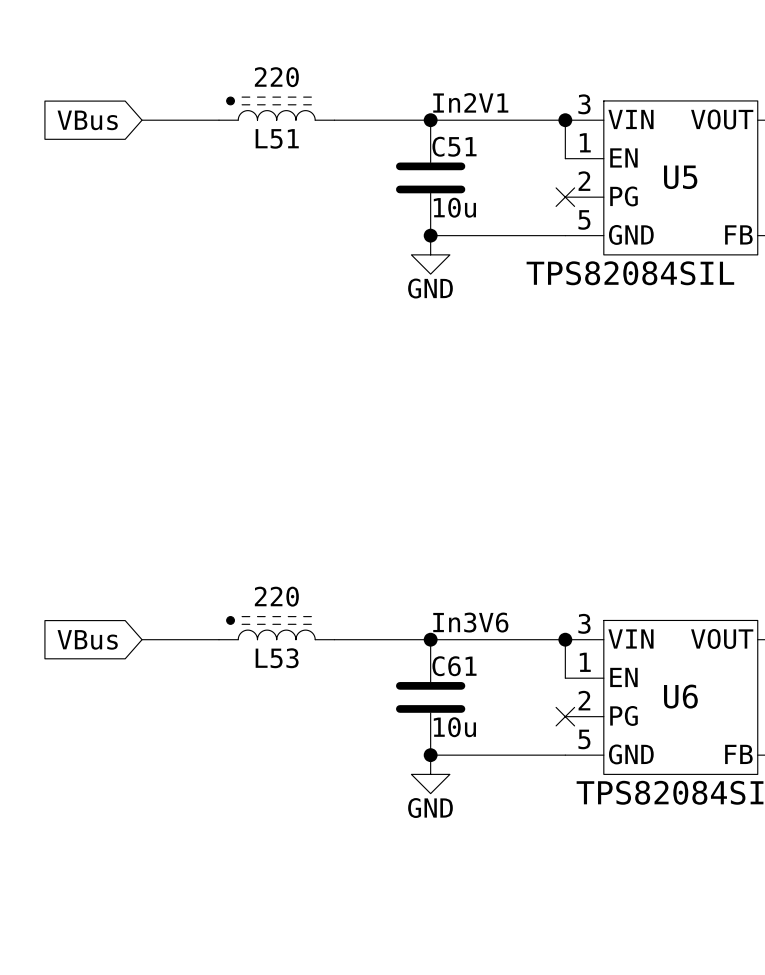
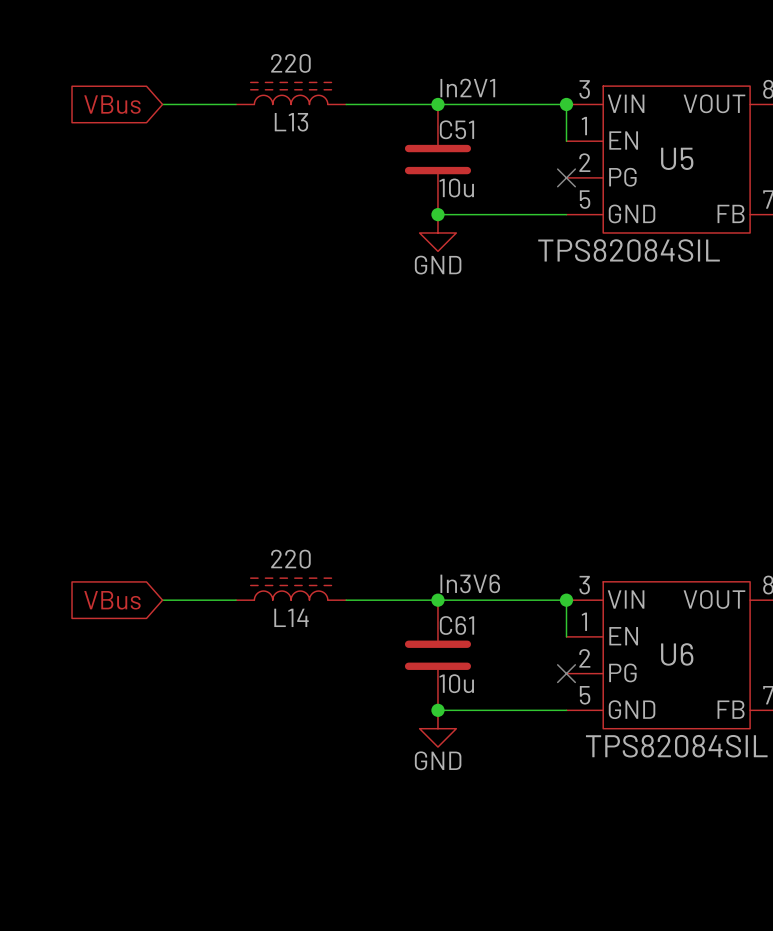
L51: 220 (276, 108) -> none
L13: none -> 220 (291, 93)
L53: 220 (276, 628) -> none
L14: none -> 220 (291, 589)

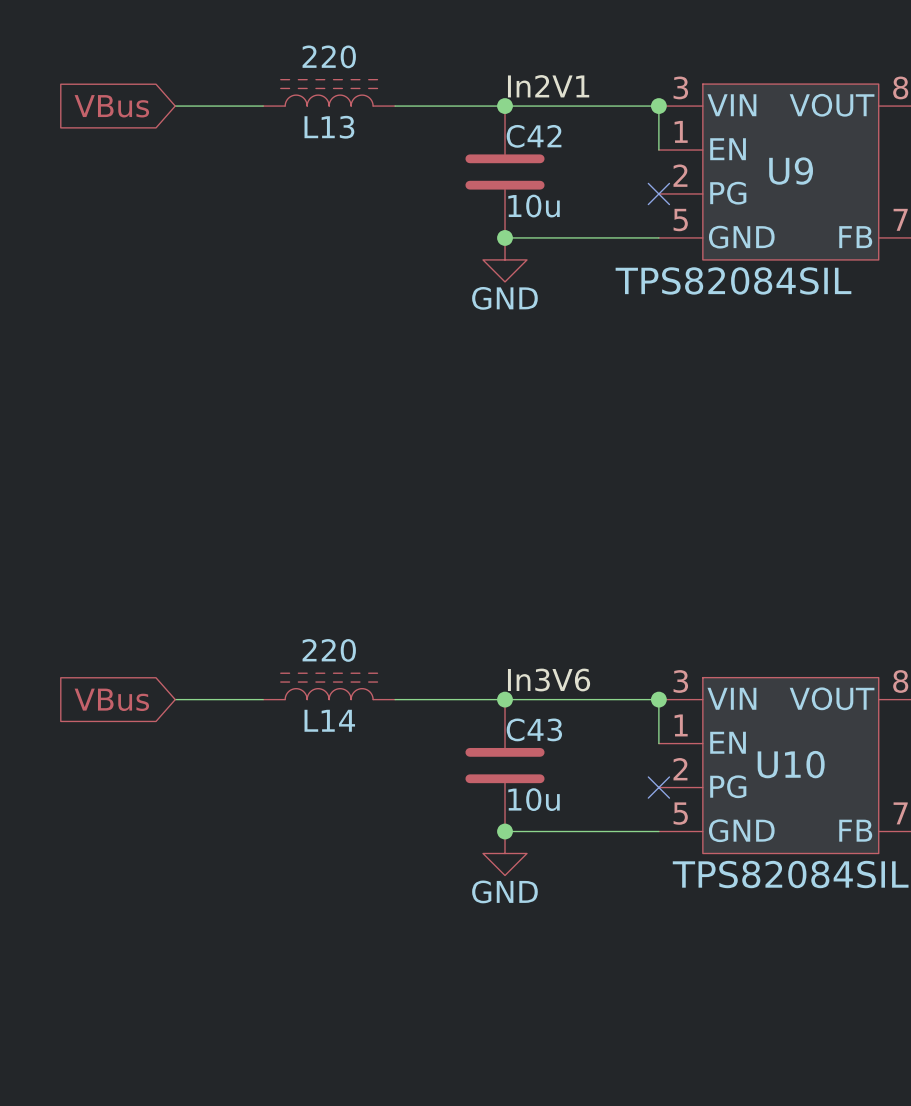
C51 name: C51 (456, 129) -> C42 (534, 136)
U5 name: U5 (677, 158) -> U9 (791, 171)
C61 name: C61 (457, 625) -> C43 (534, 729)
U6 name: U6 (677, 654) -> U10 (791, 764)

